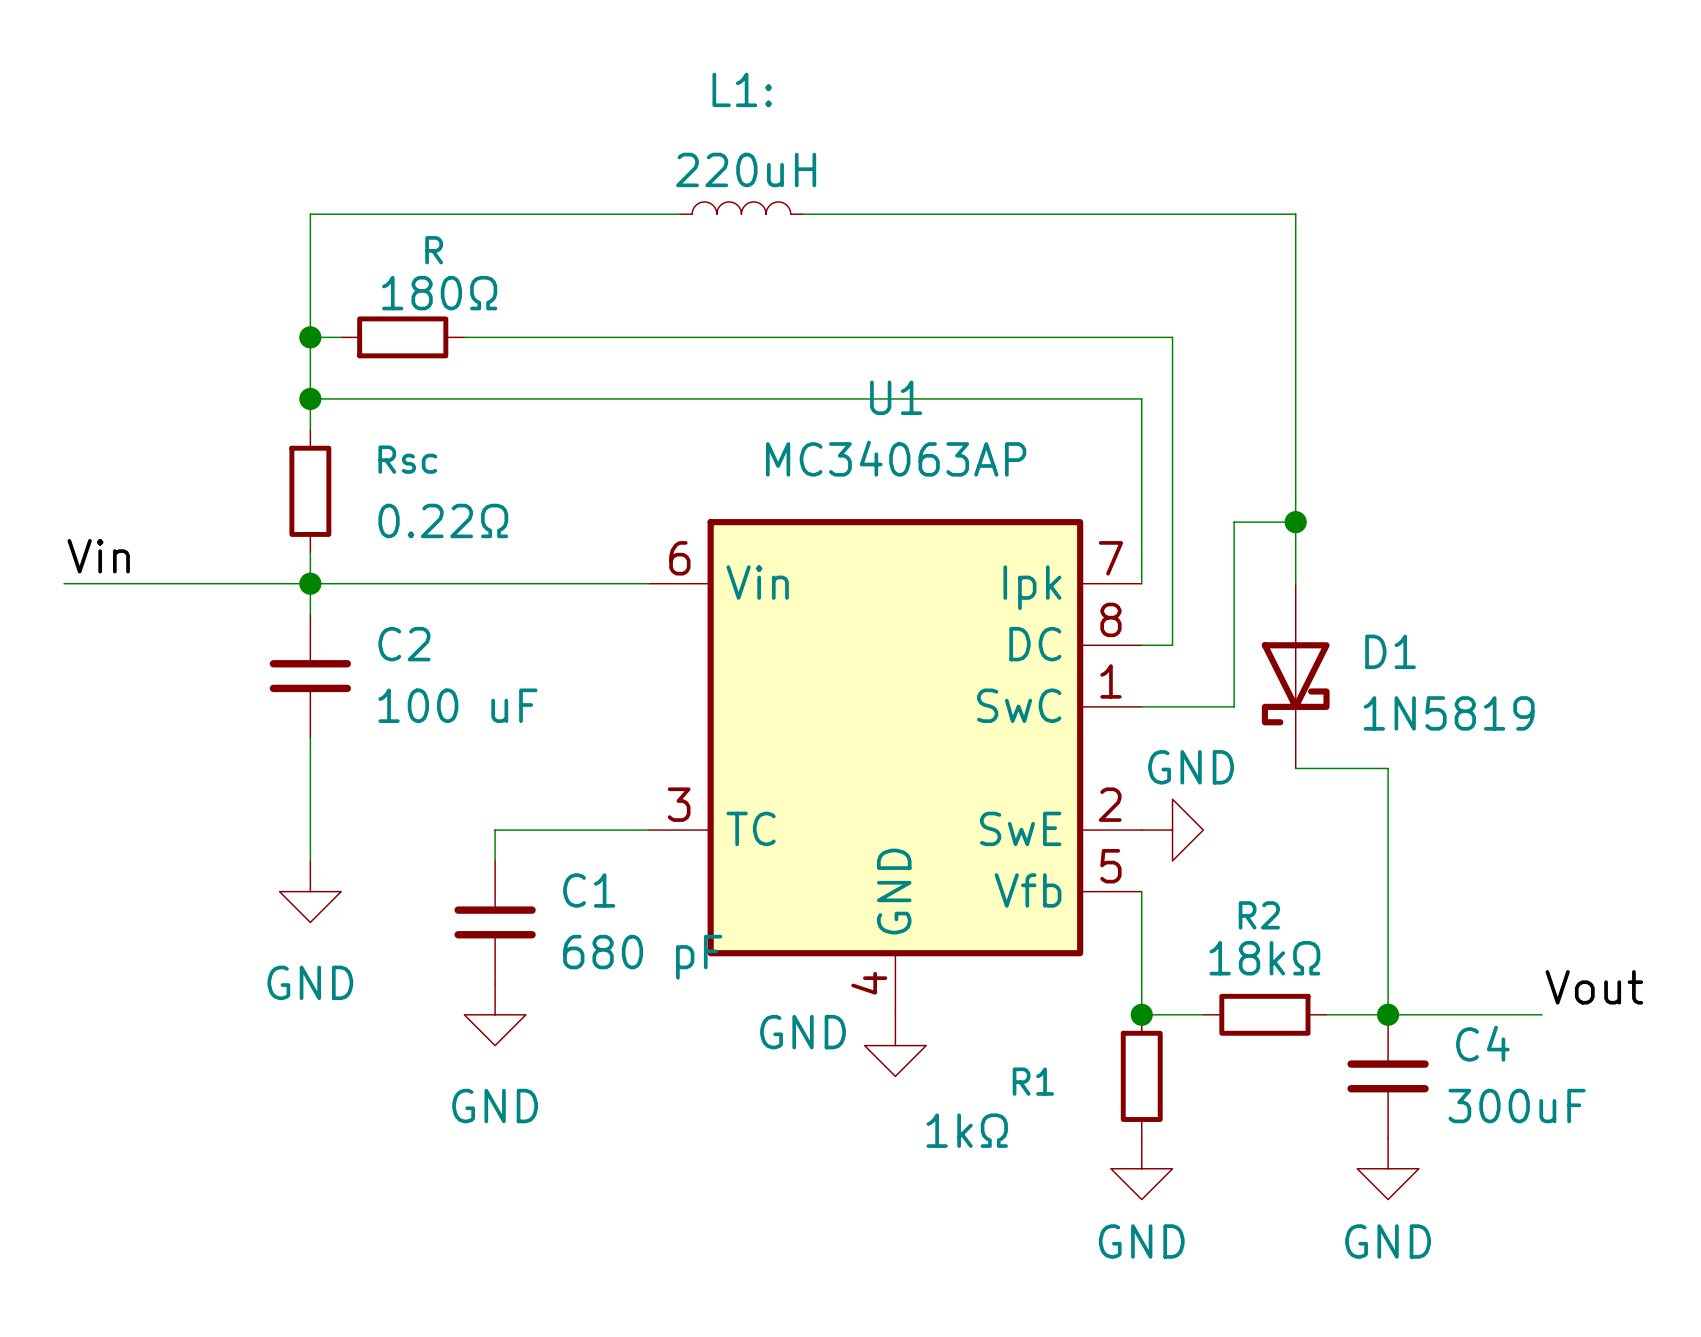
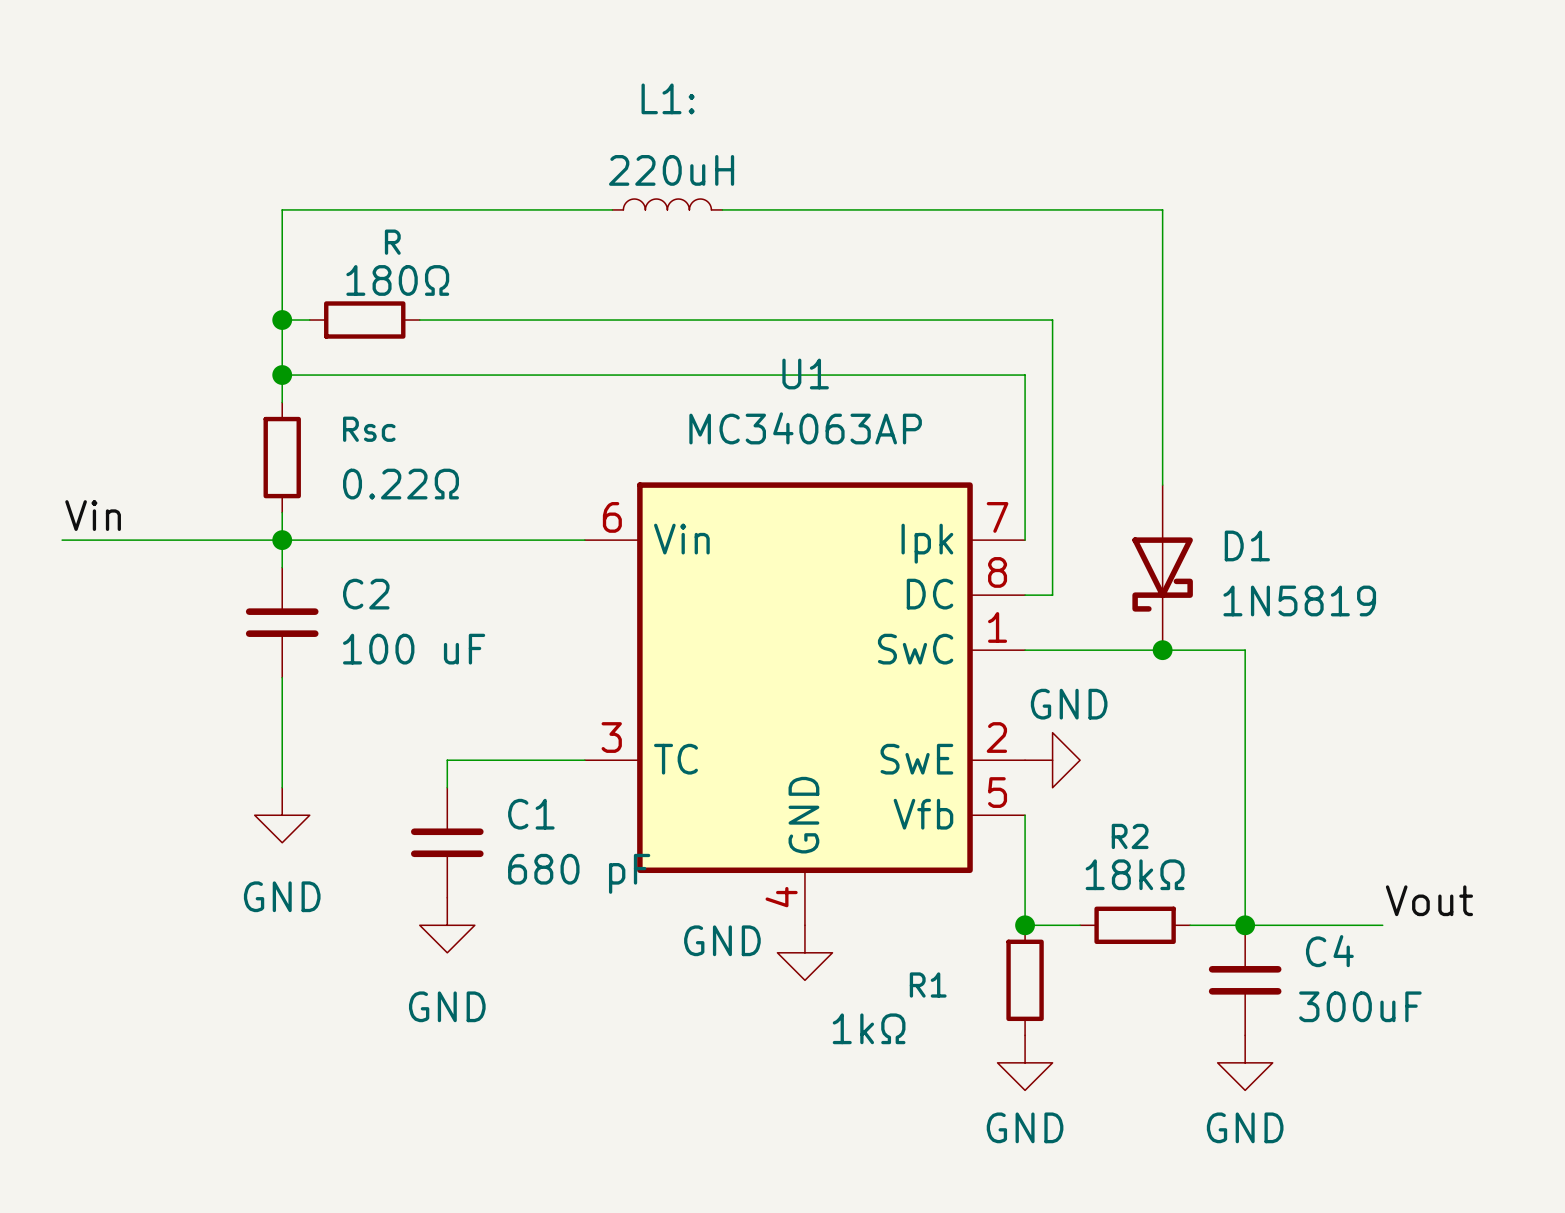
junction: (1295, 522) -> none
wire: (1295, 583) (1295, 522) (1234, 522) (1234, 706) -> none
D1 position: (1295, 676) -> (1162, 567)
junction: none -> (1162, 650)
wire: (1295, 768) (1388, 768) -> (1107, 650) (1245, 650) (1245, 705)

